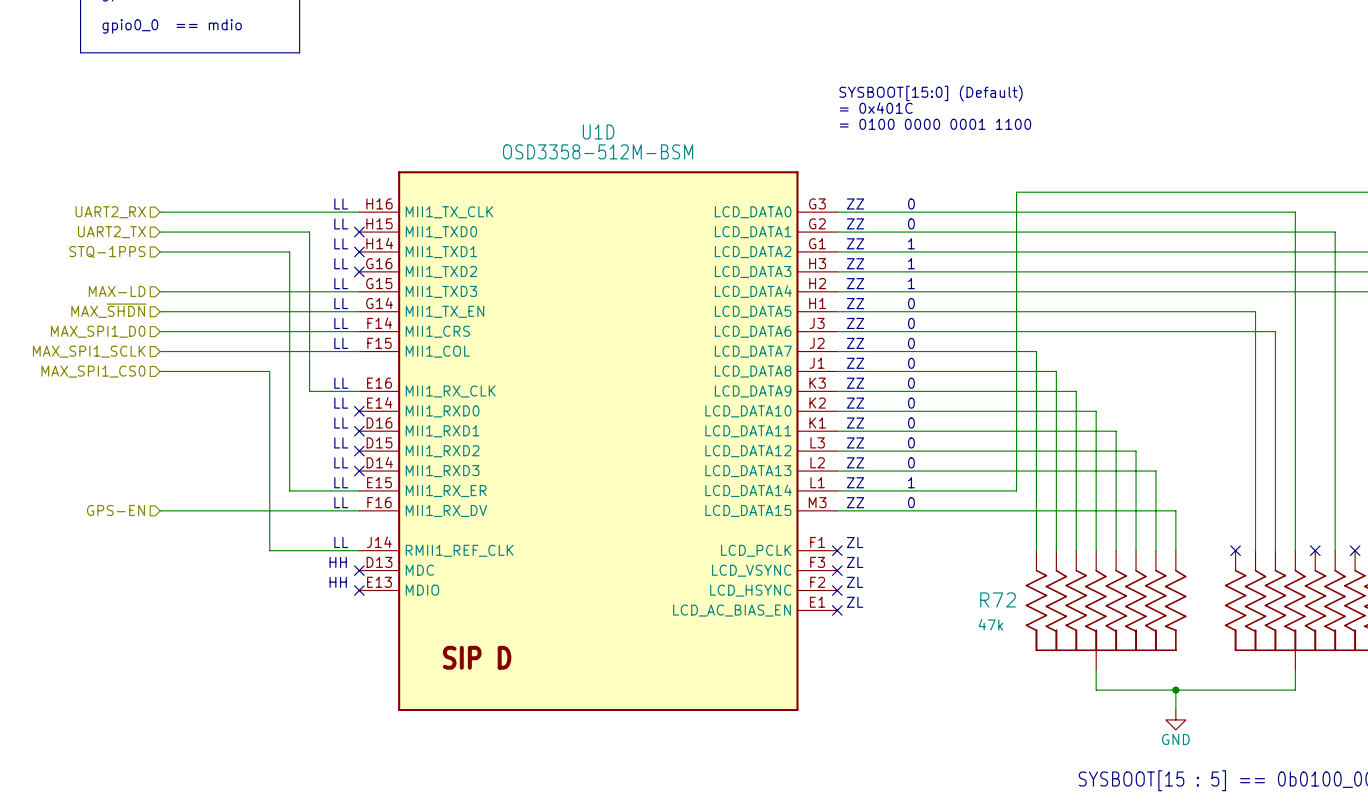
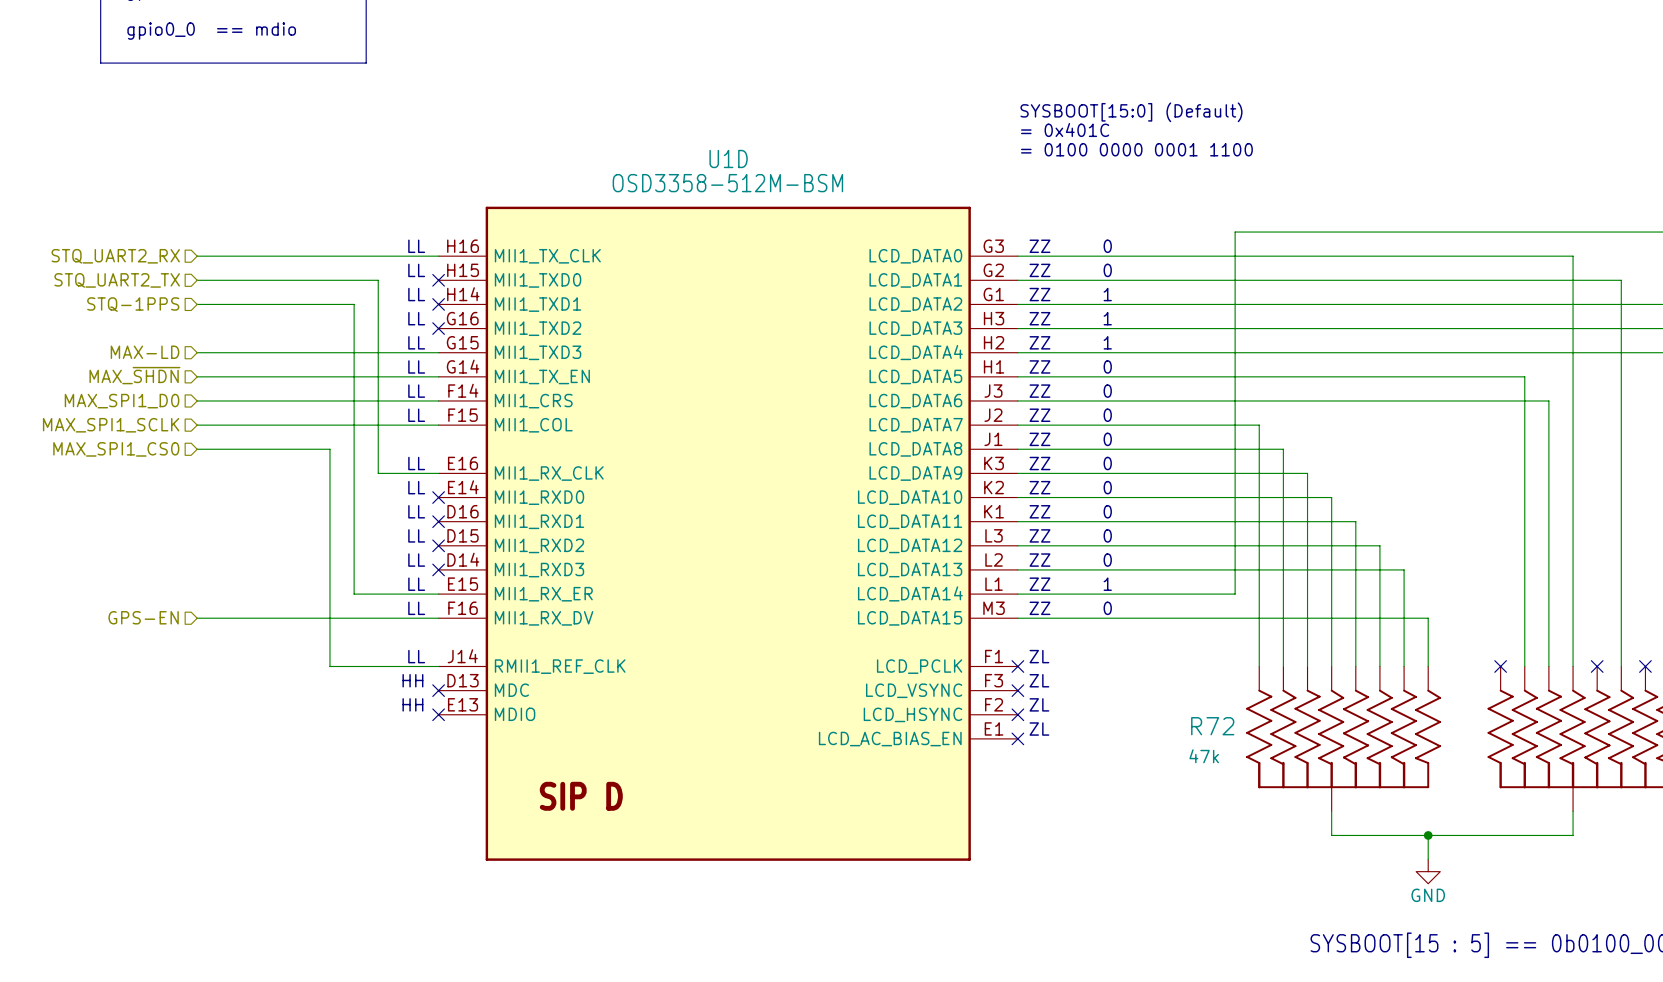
hierarchical label: UART2_RX (110, 212) -> STQ_UART2_RX (115, 256)
hierarchical label: UART2_TX (111, 232) -> STQ_UART2_TX (117, 280)

